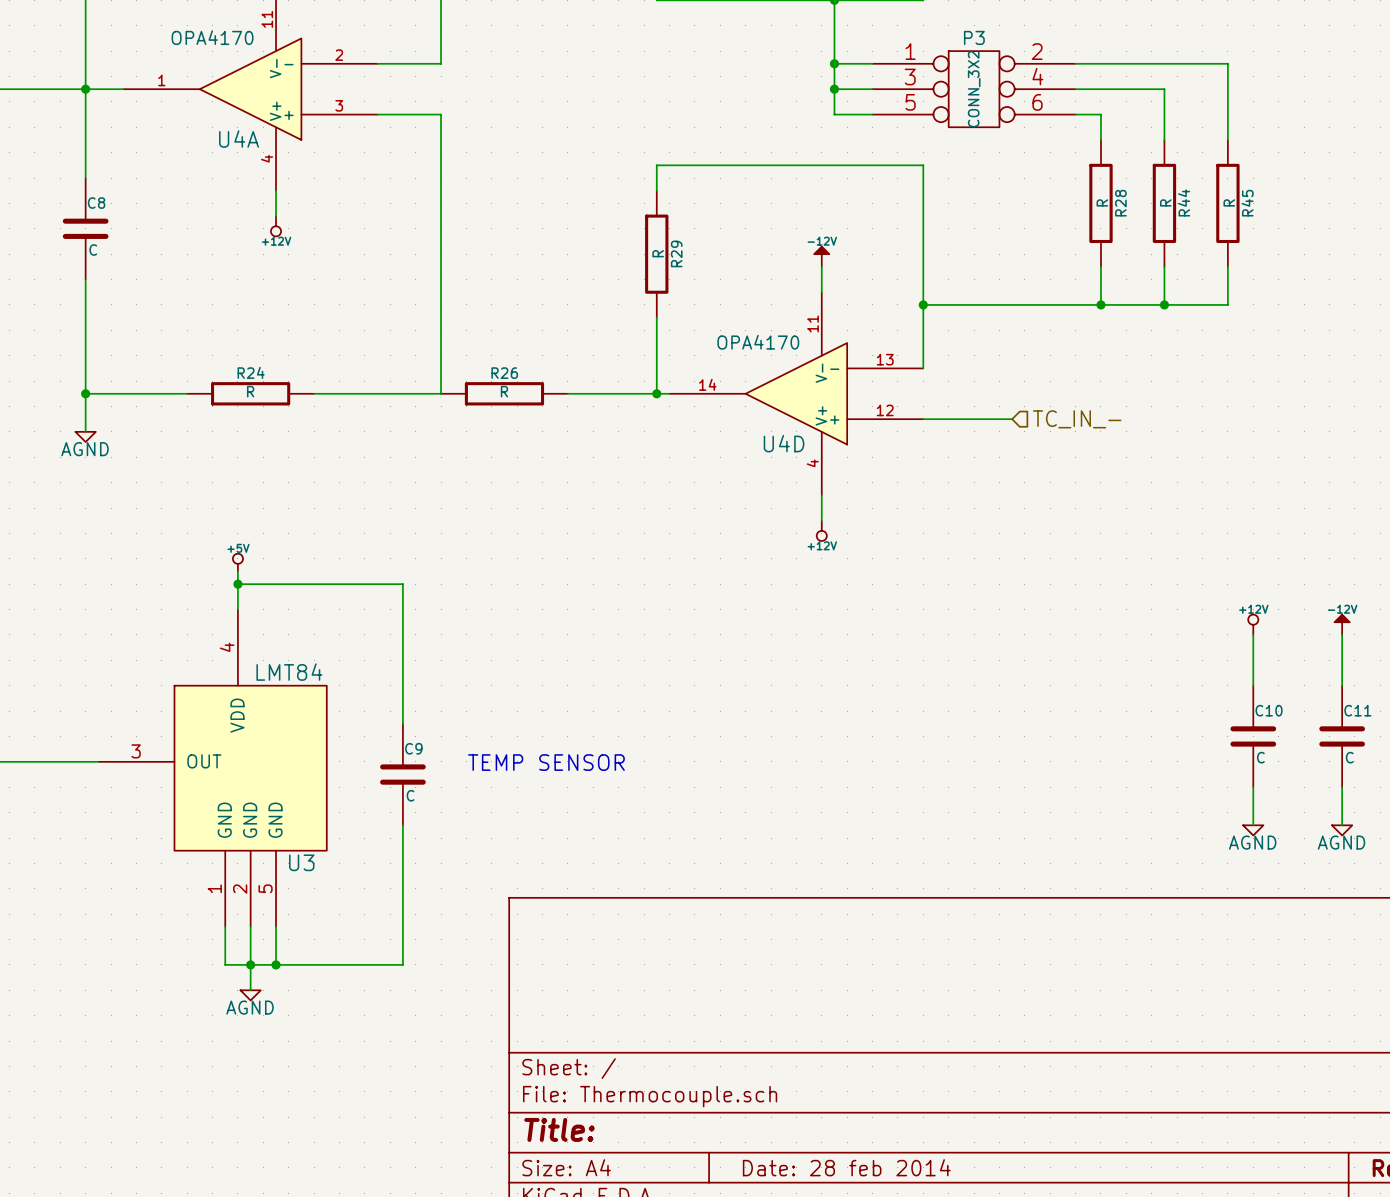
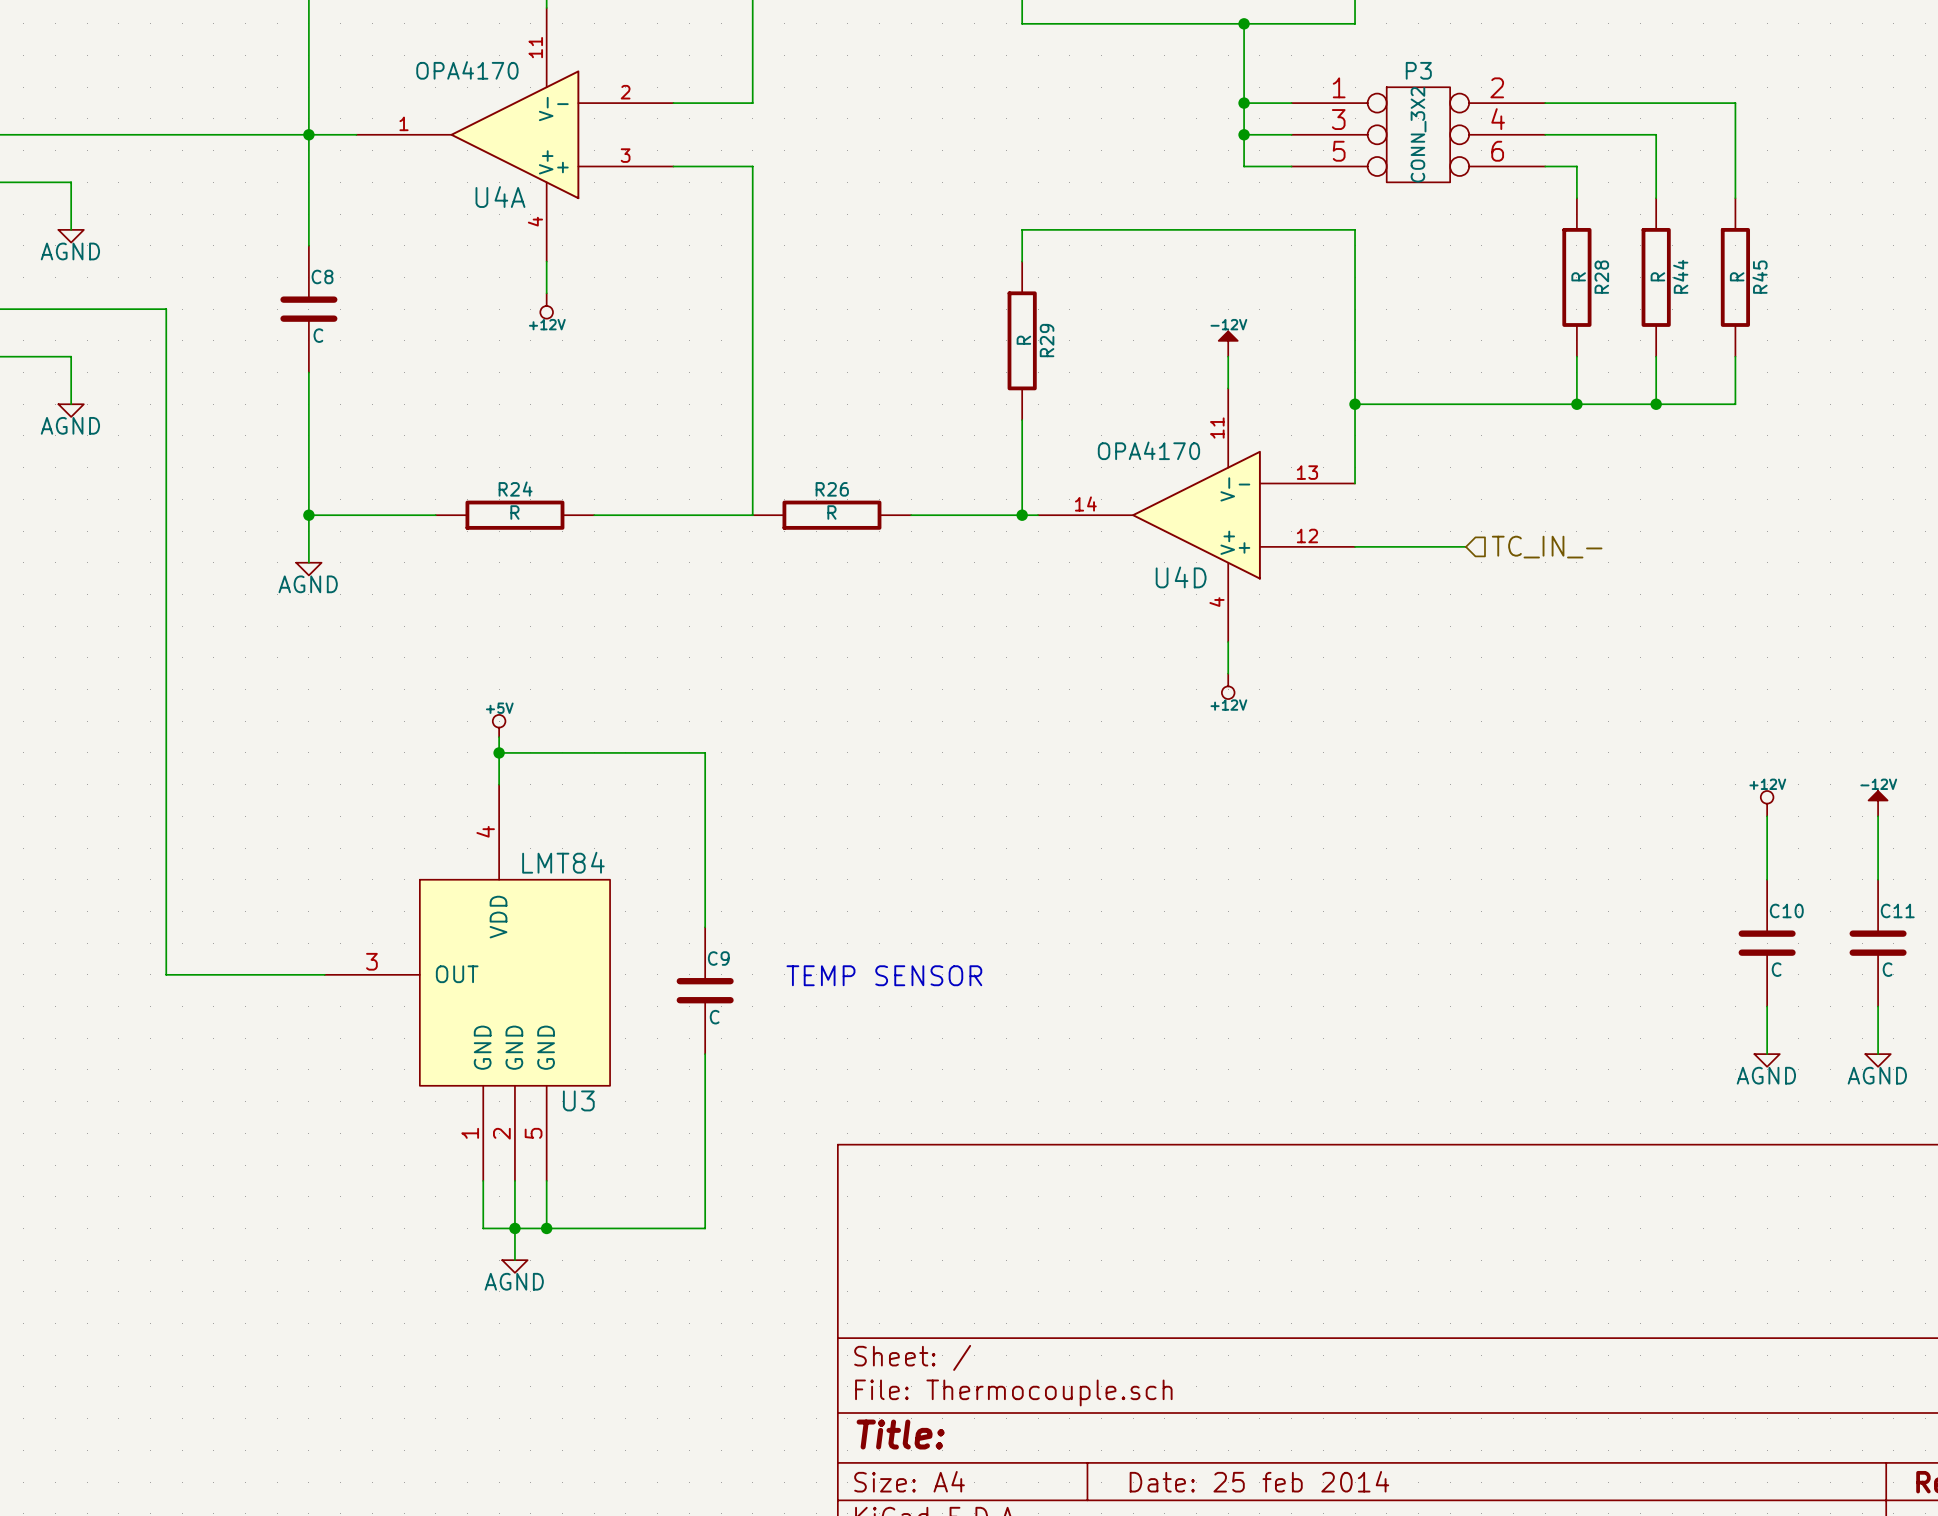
title block: Date: 28 feb 2014 (846, 1167) -> Date: 25 feb 2014 (1259, 1481)

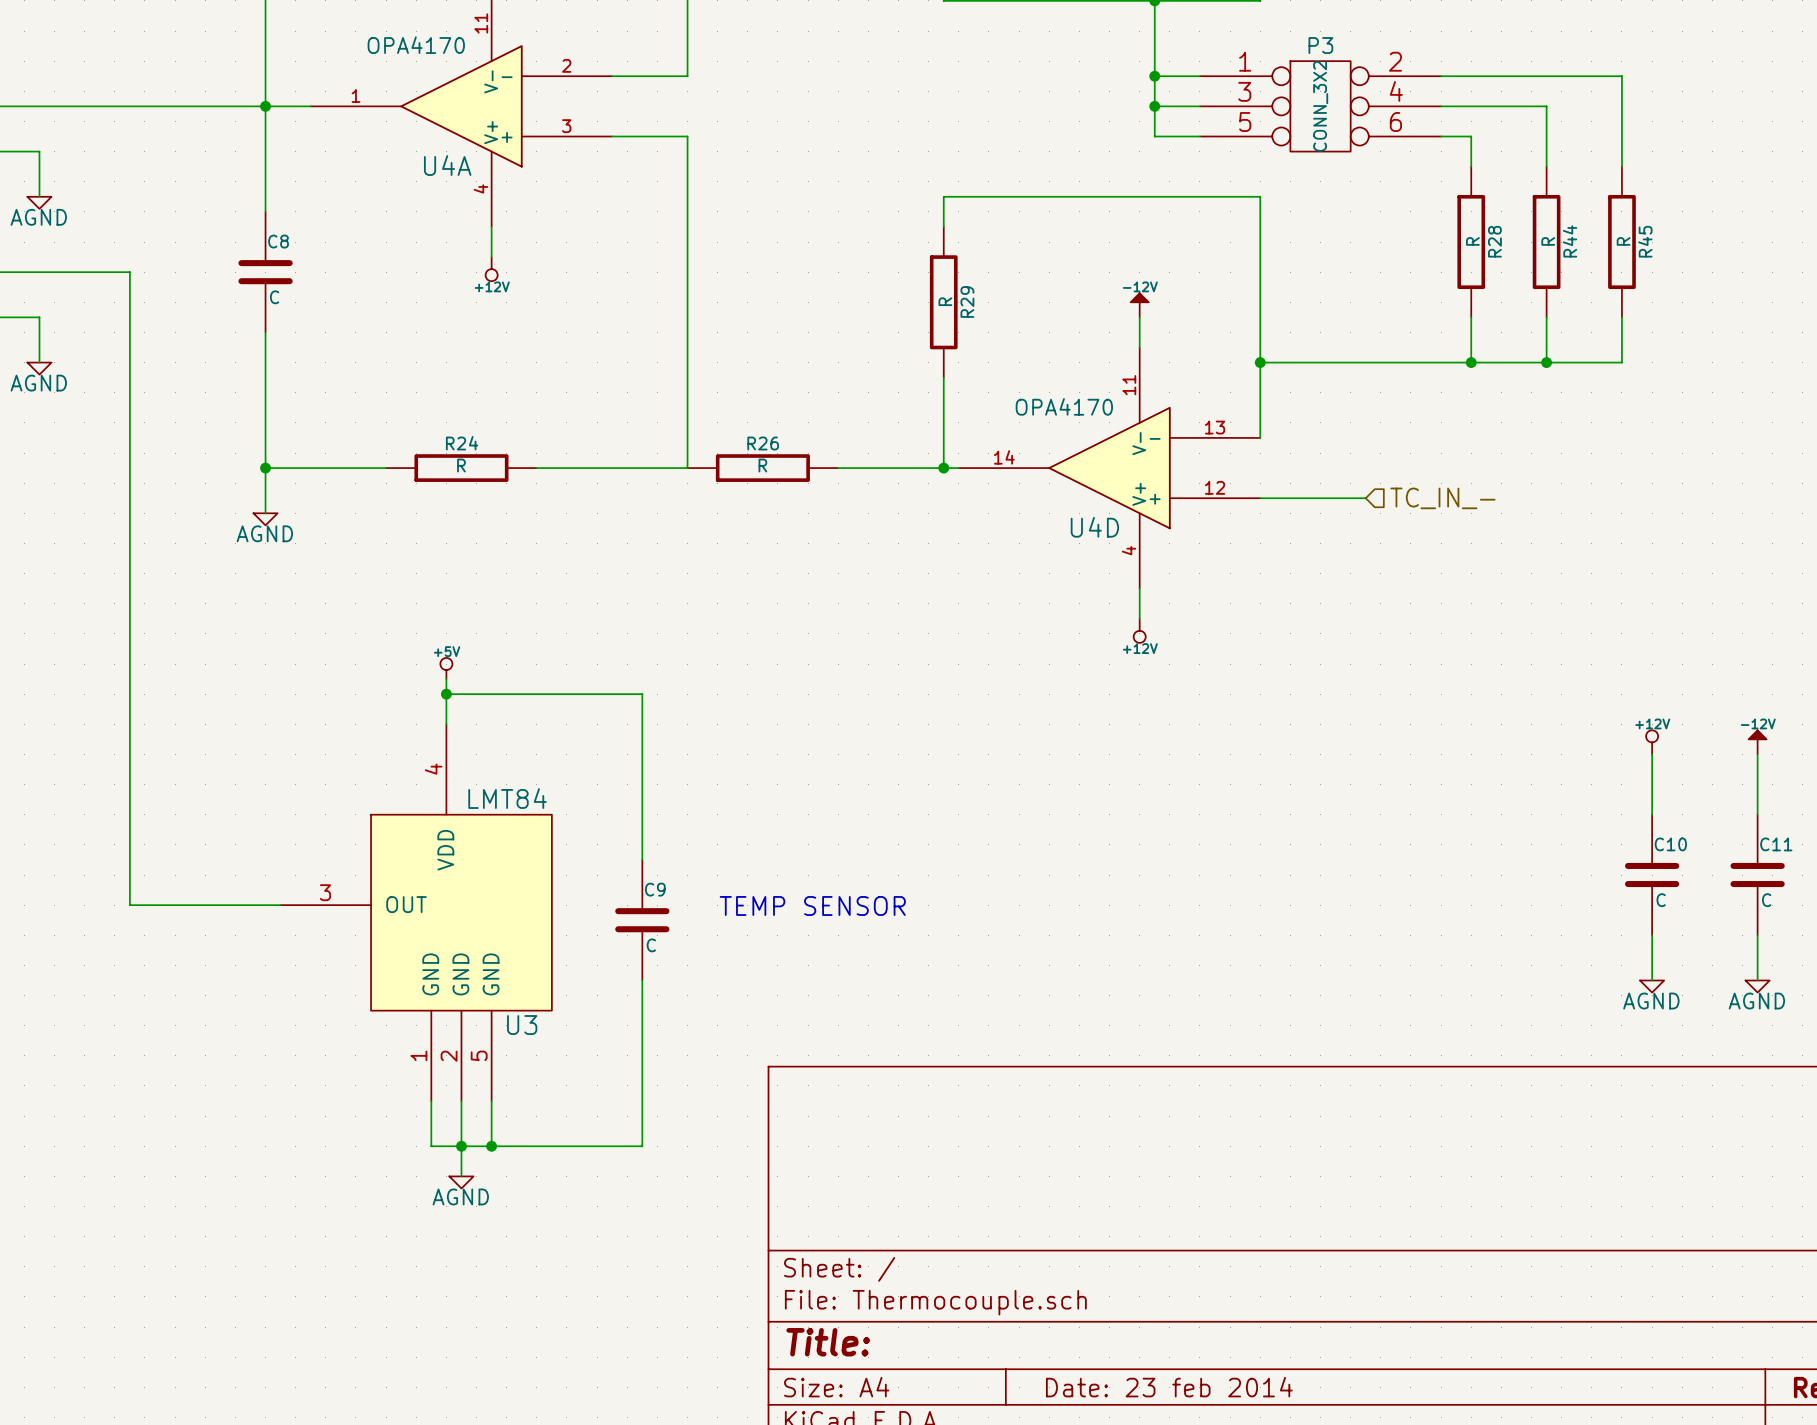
title block: Date: 25 feb 2014 (1259, 1481) -> Date: 23 feb 2014 (1169, 1387)

